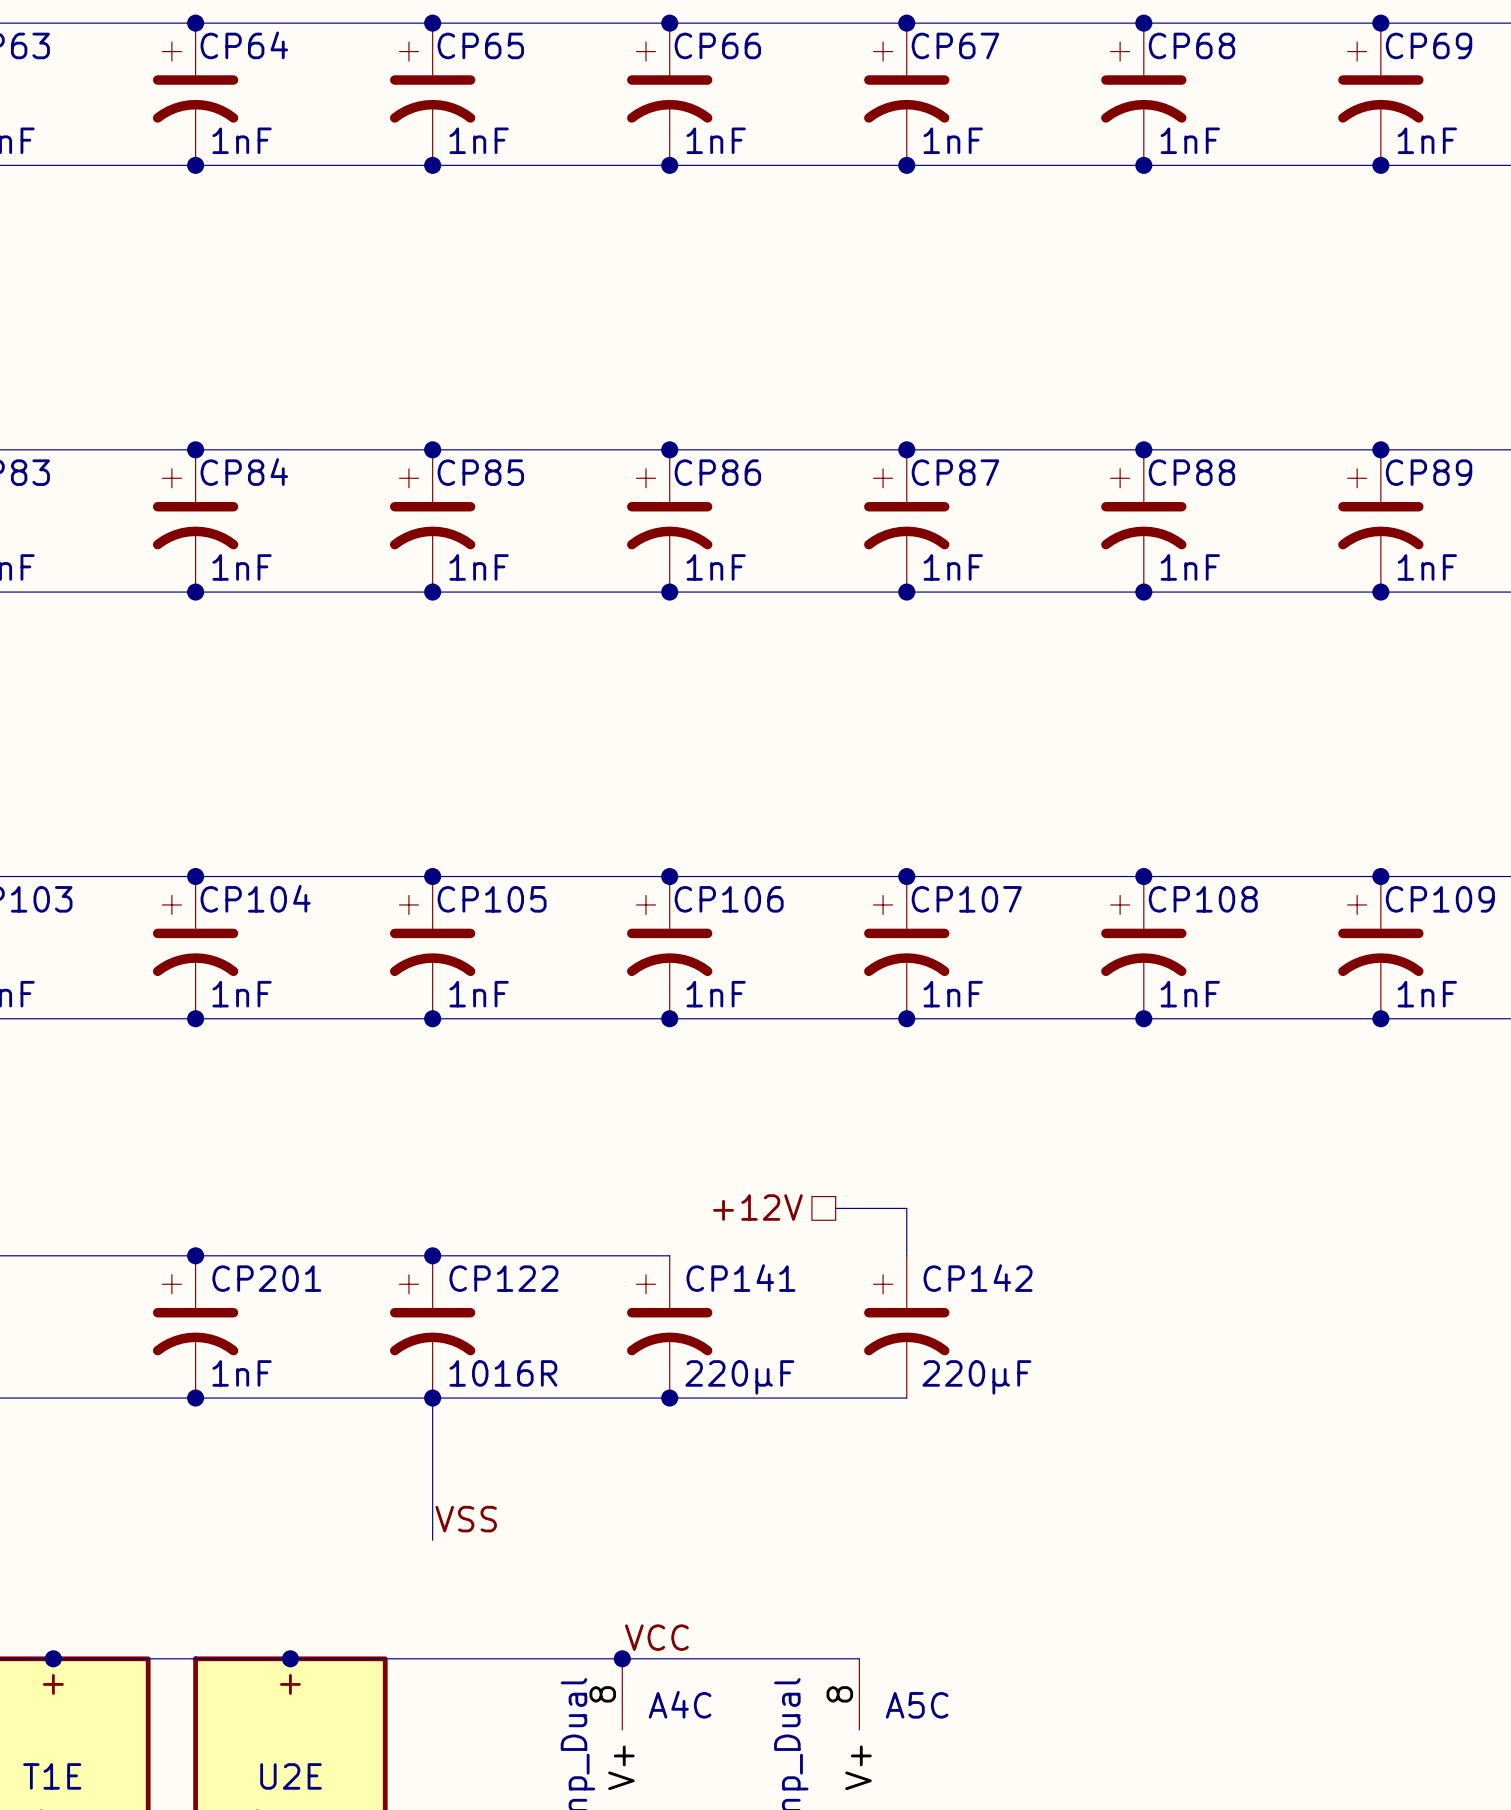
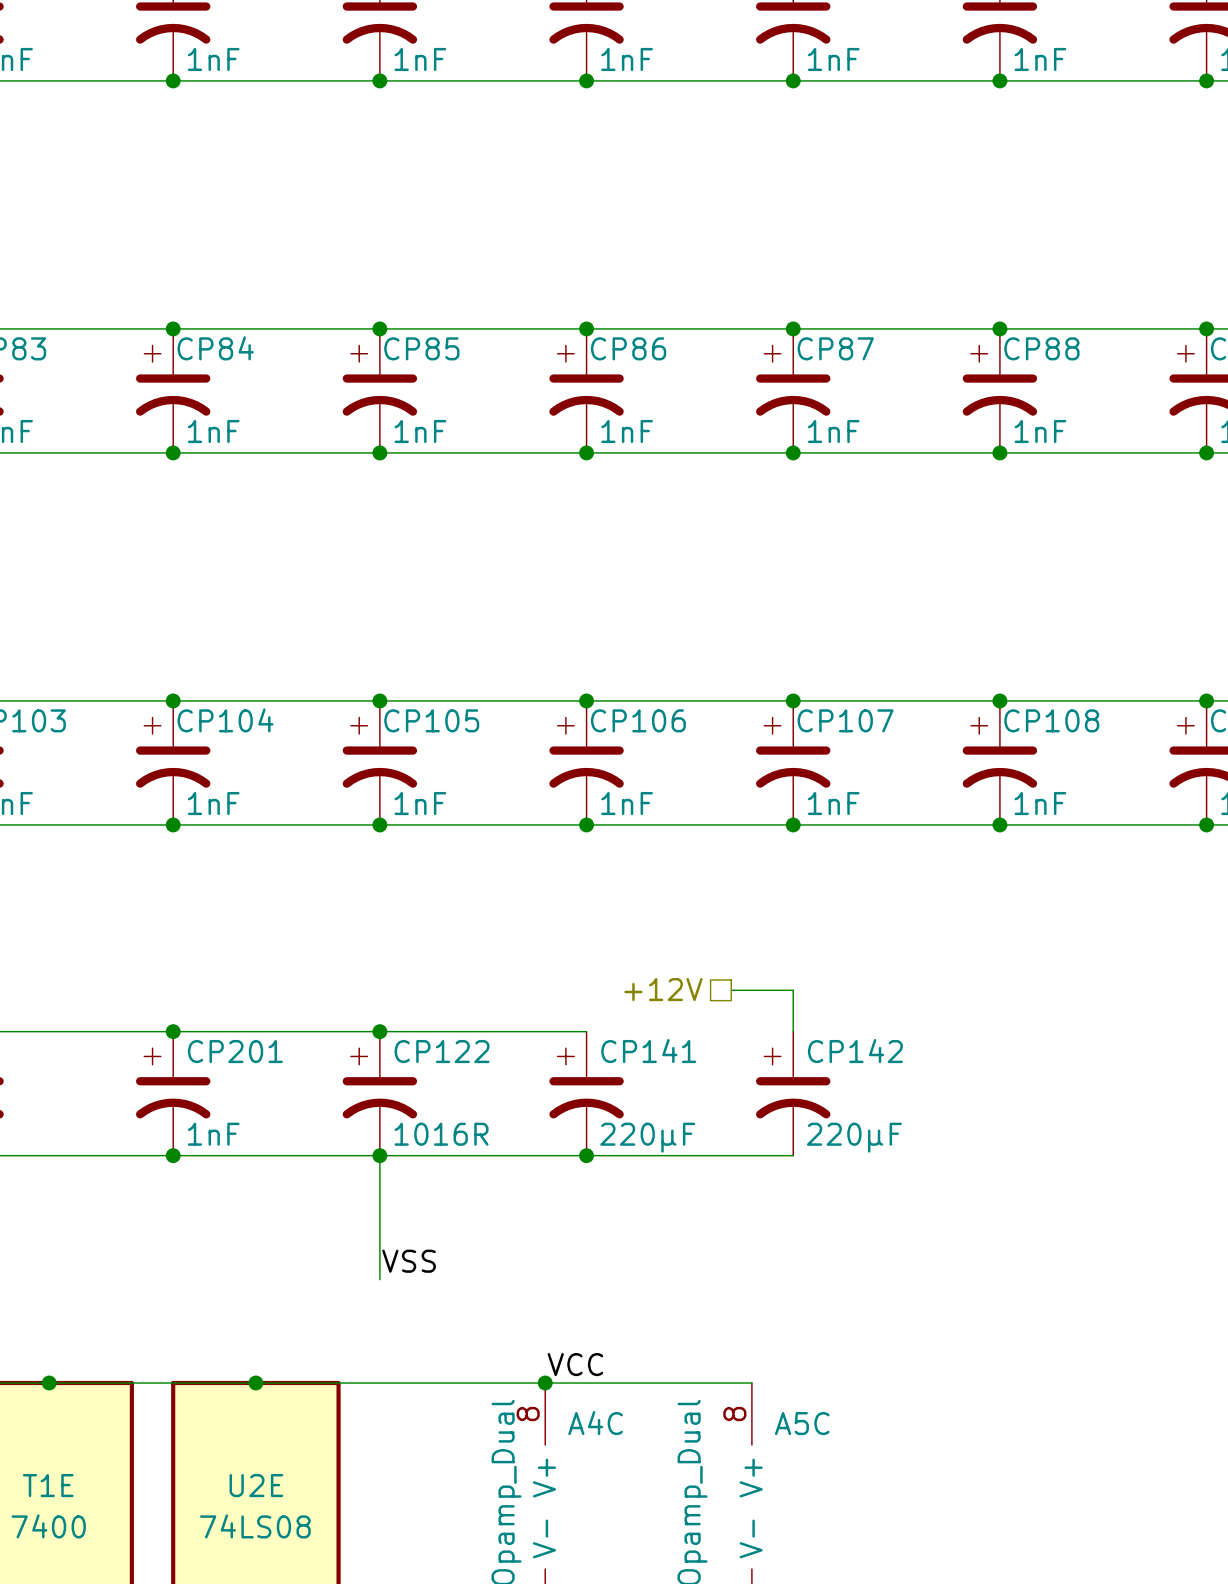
T1E text: + (53, 1684) -> none
U2E text: + (290, 1684) -> none

